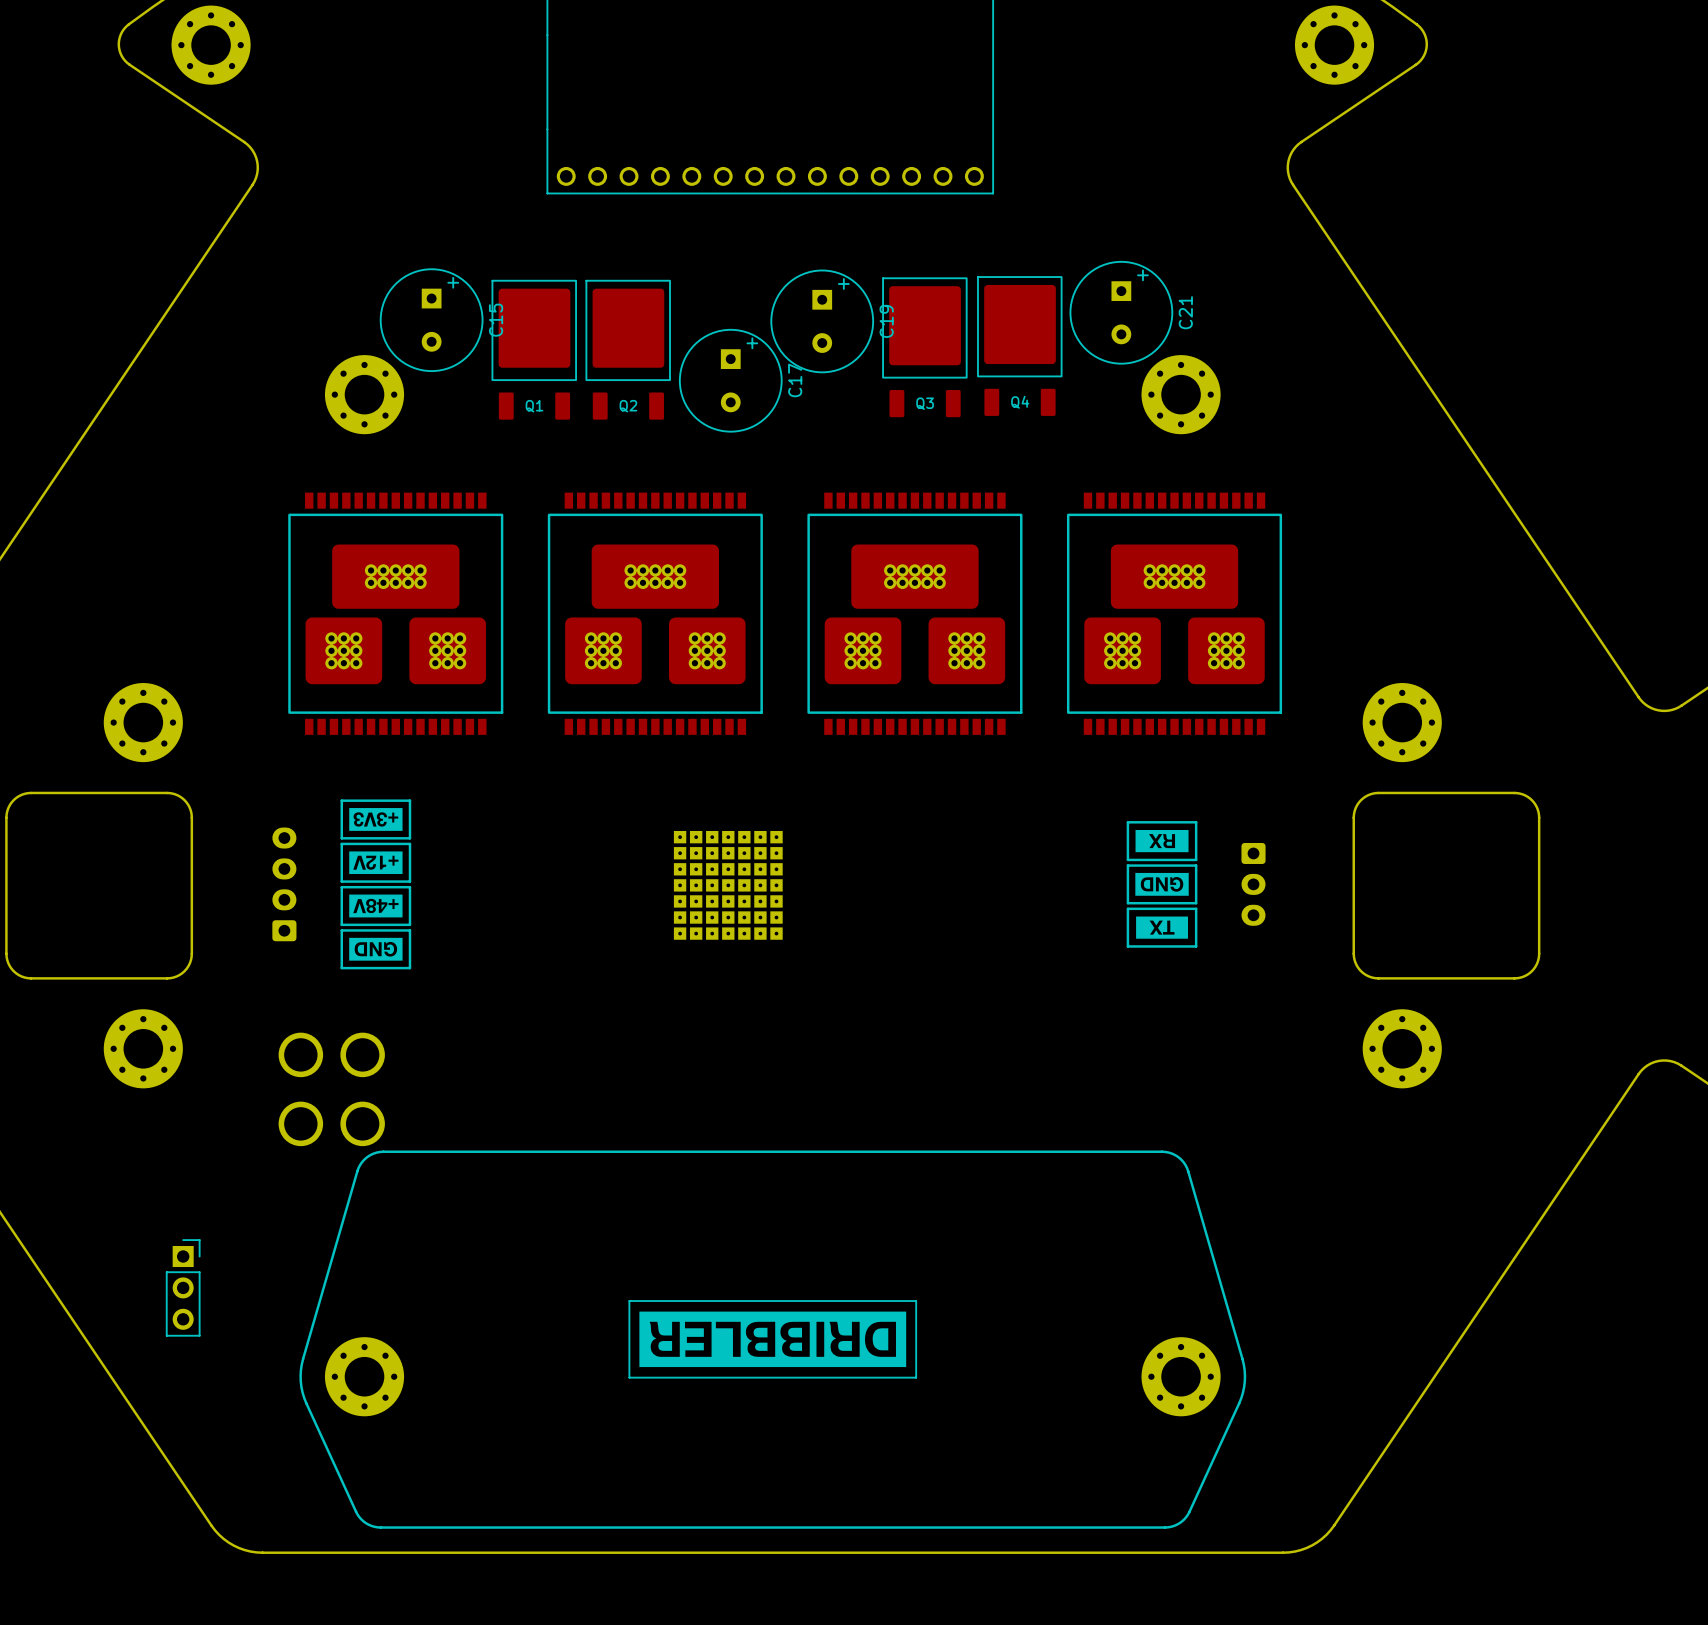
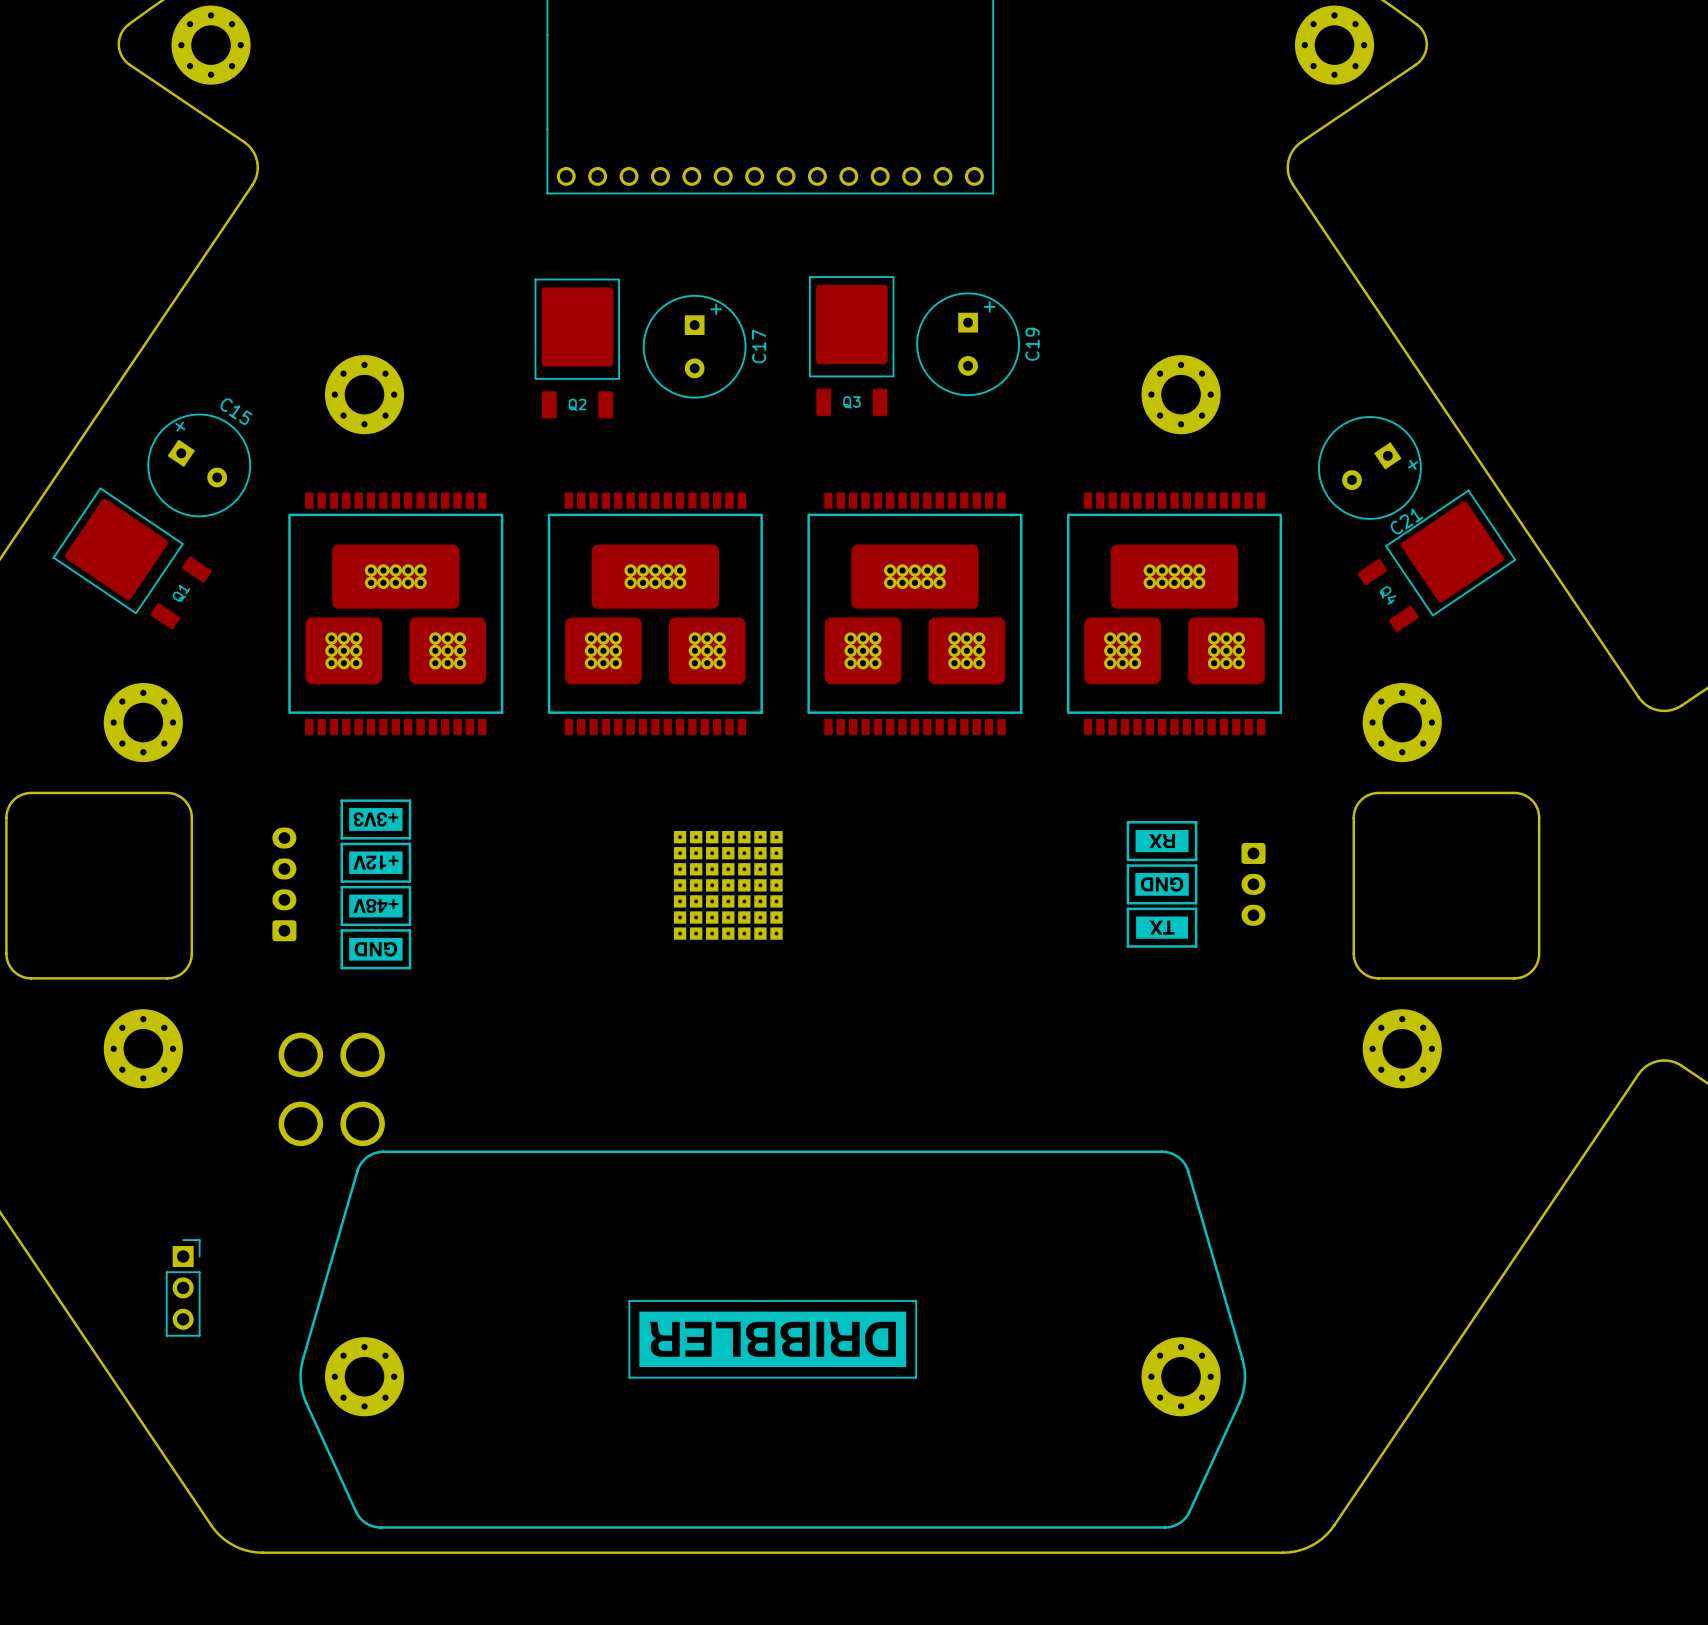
C21 rotation: 0° (1121, 312) -> 56° clockwise (1369, 467)
C21 position: (1121, 312) -> (1369, 467)
C15 rotation: 0° (431, 320) -> 56° counterclockwise (199, 465)
C15 position: (431, 320) -> (199, 465)
C19 position: (822, 321) -> (968, 344)
Q4 rotation: 0° (1019, 346) -> 56° clockwise (1436, 560)
Q4 position: (1019, 346) -> (1436, 560)
Q3 position: (924, 347) -> (851, 346)
Q1 rotation: 0° (534, 349) -> 56° counterclockwise (132, 558)
Q1 position: (534, 349) -> (132, 558)
Q2 position: (628, 349) -> (577, 348)
C17 position: (730, 380) -> (694, 346)

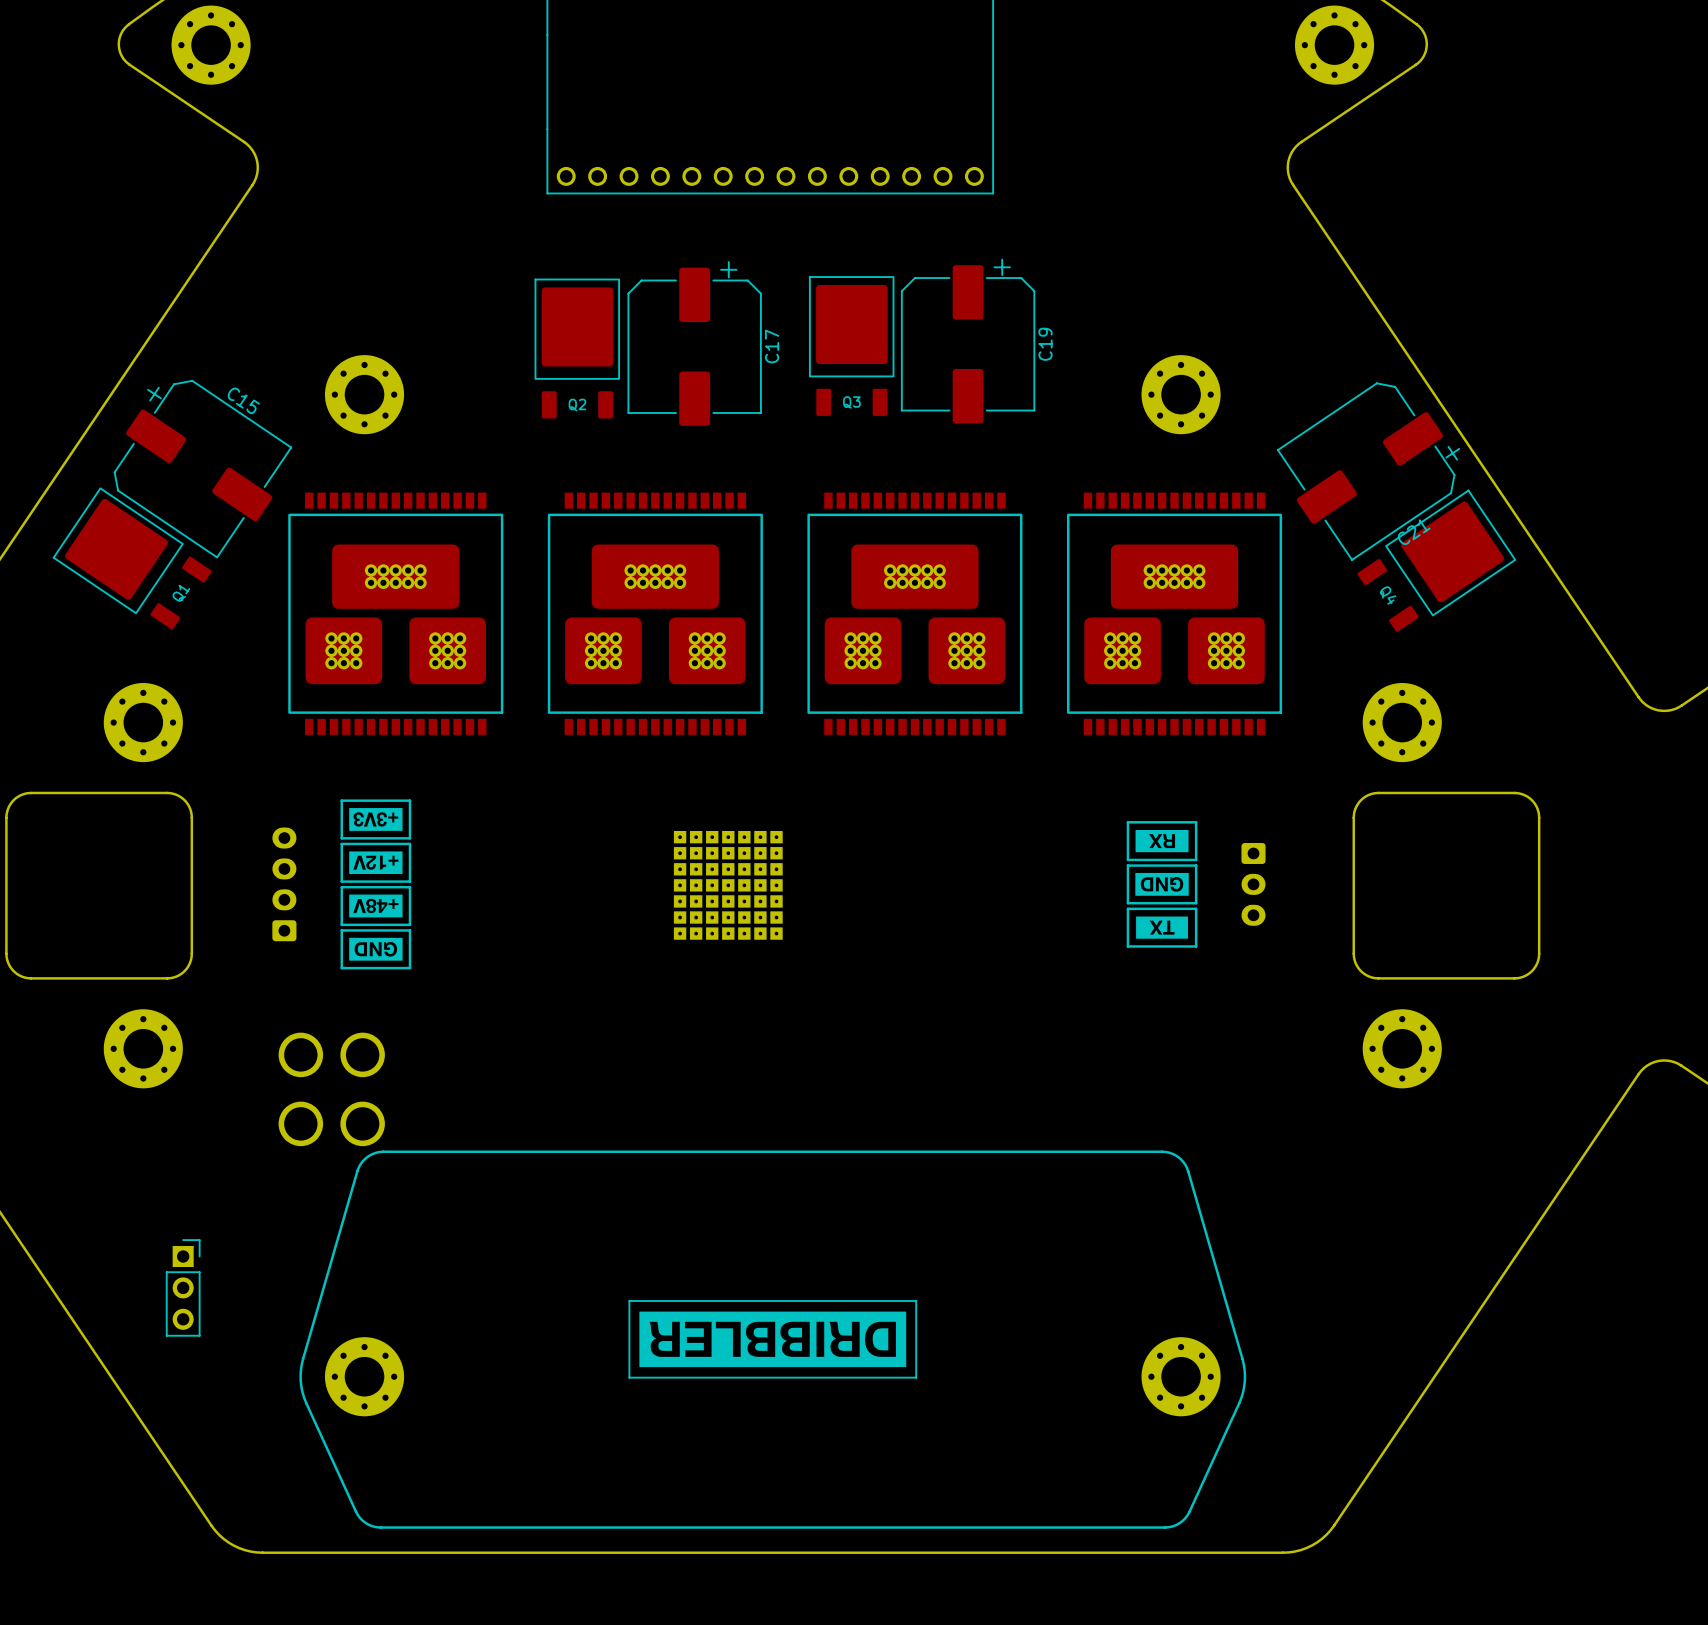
C19 footprint: [916, 292, 1020, 396] -> [901, 258, 1036, 424]
C17 footprint: [643, 295, 747, 399] -> [627, 261, 762, 426]
C15 footprint: [147, 413, 251, 518] -> [113, 380, 292, 559]
C21 footprint: [1318, 416, 1422, 520] -> [1277, 382, 1460, 561]

